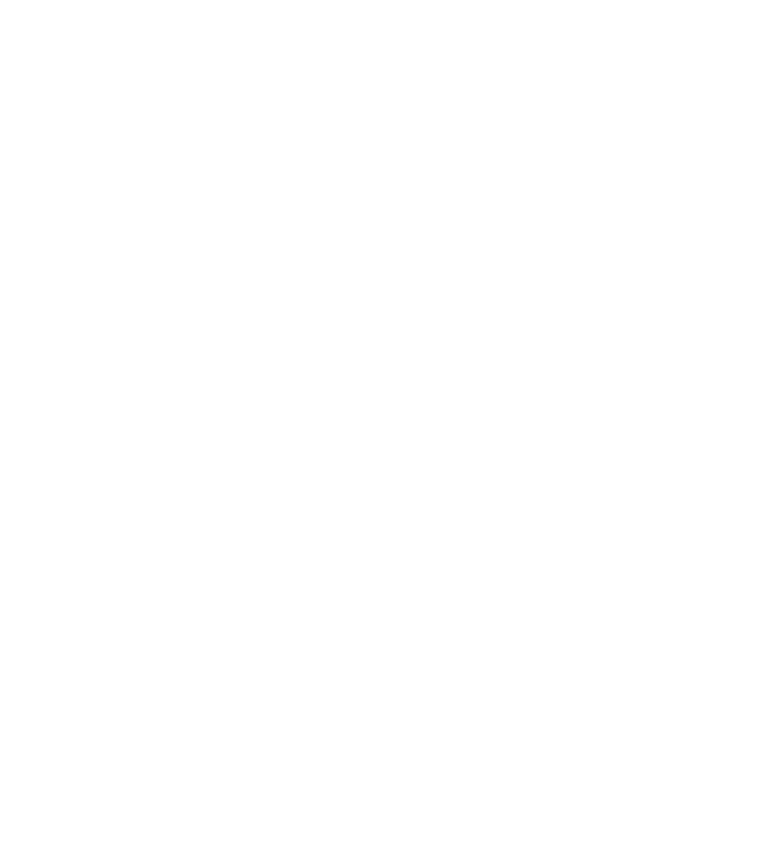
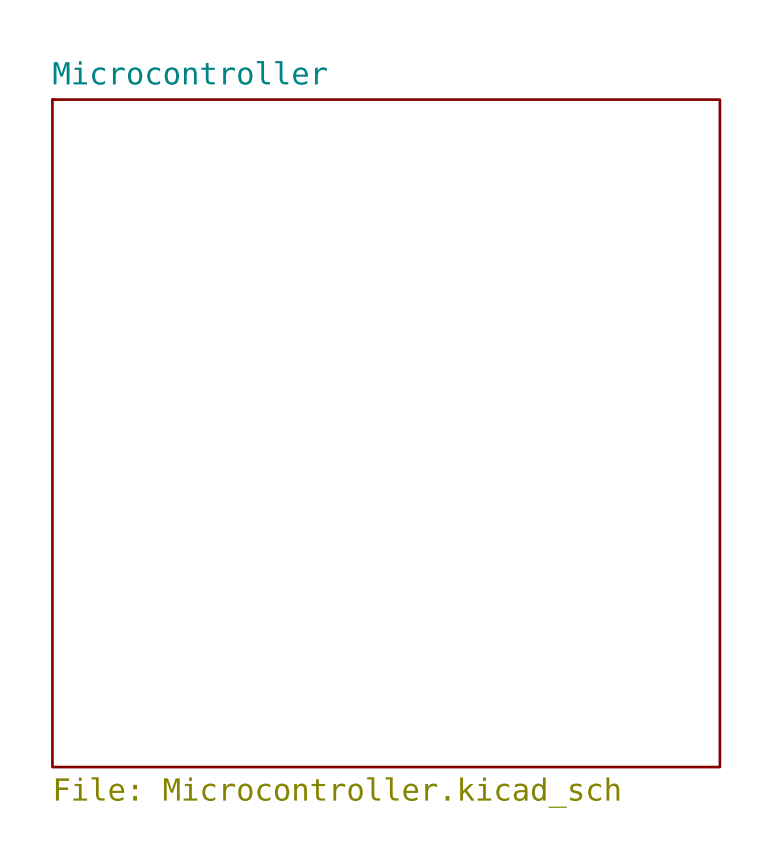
sheet Microcontroller: none -> File: Microcontroller.kicad_sch (386, 433)

